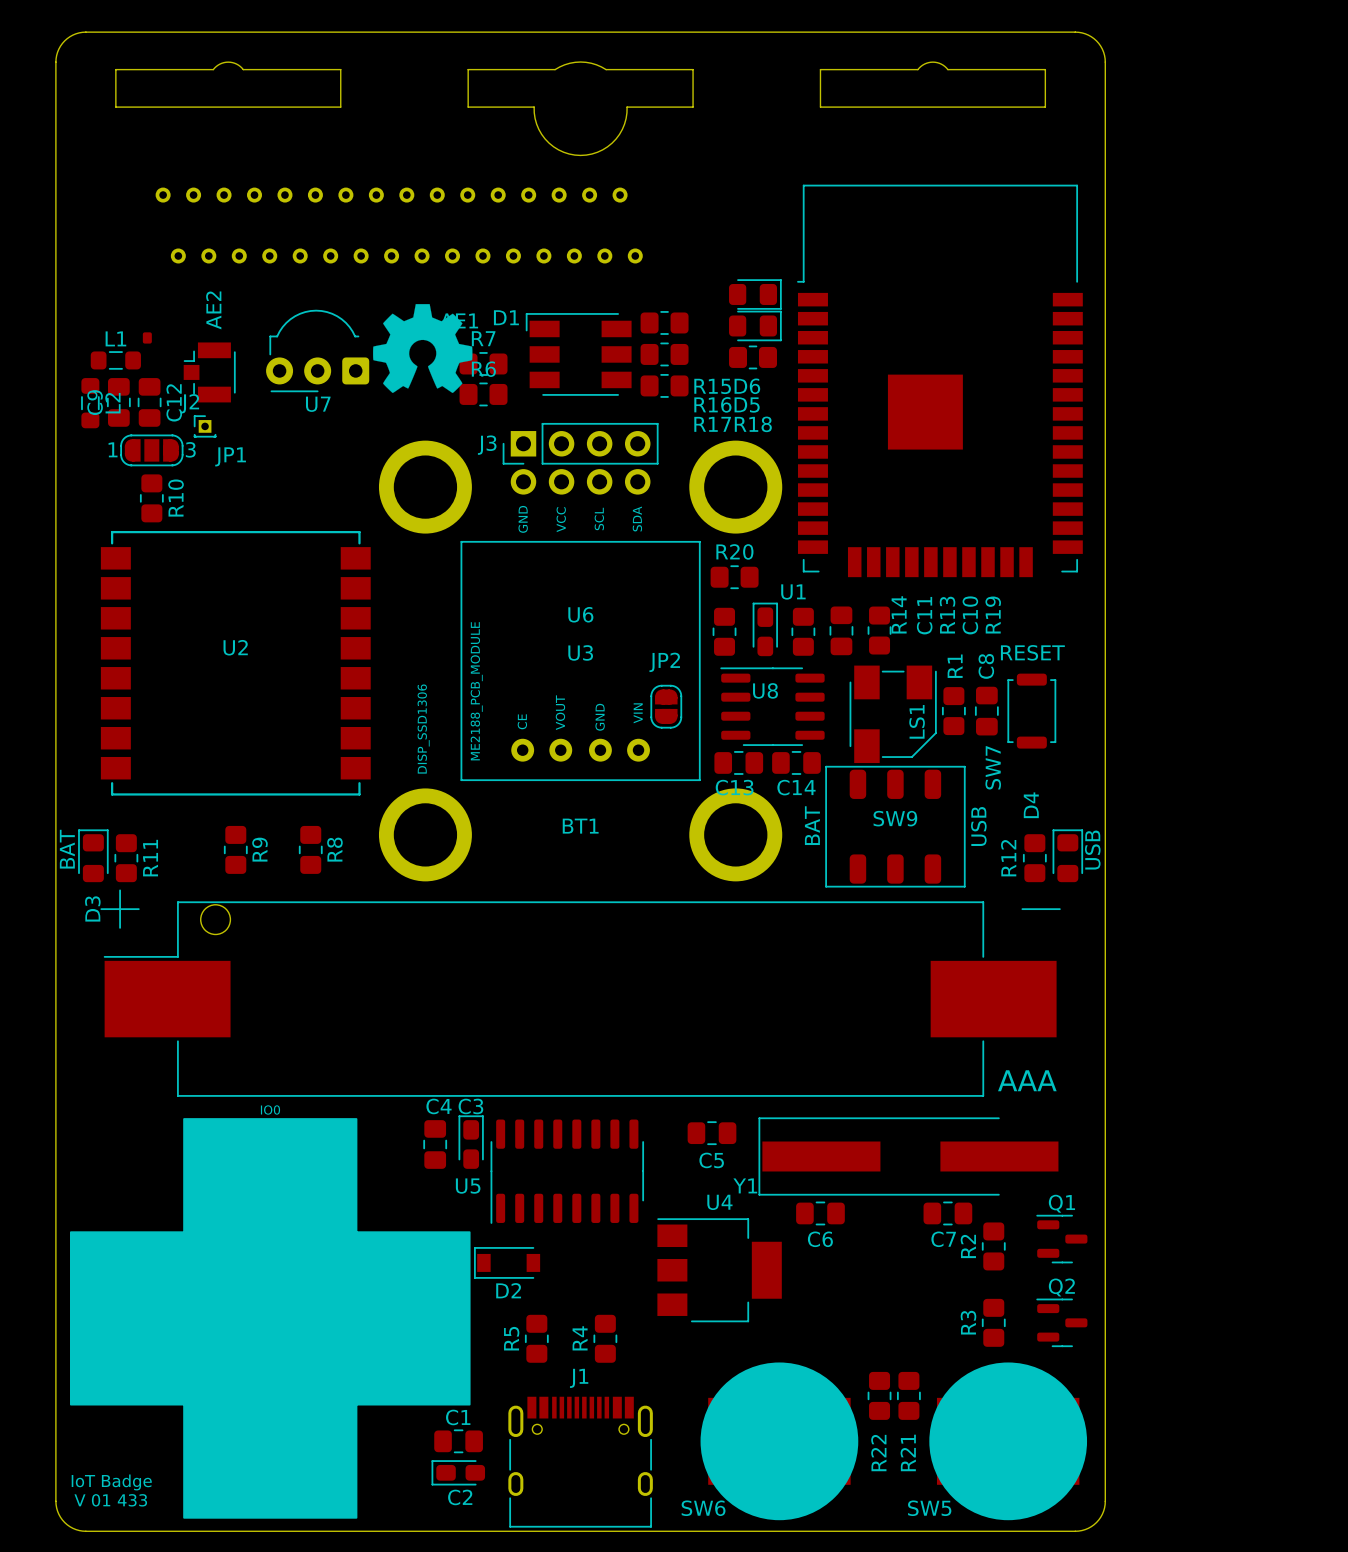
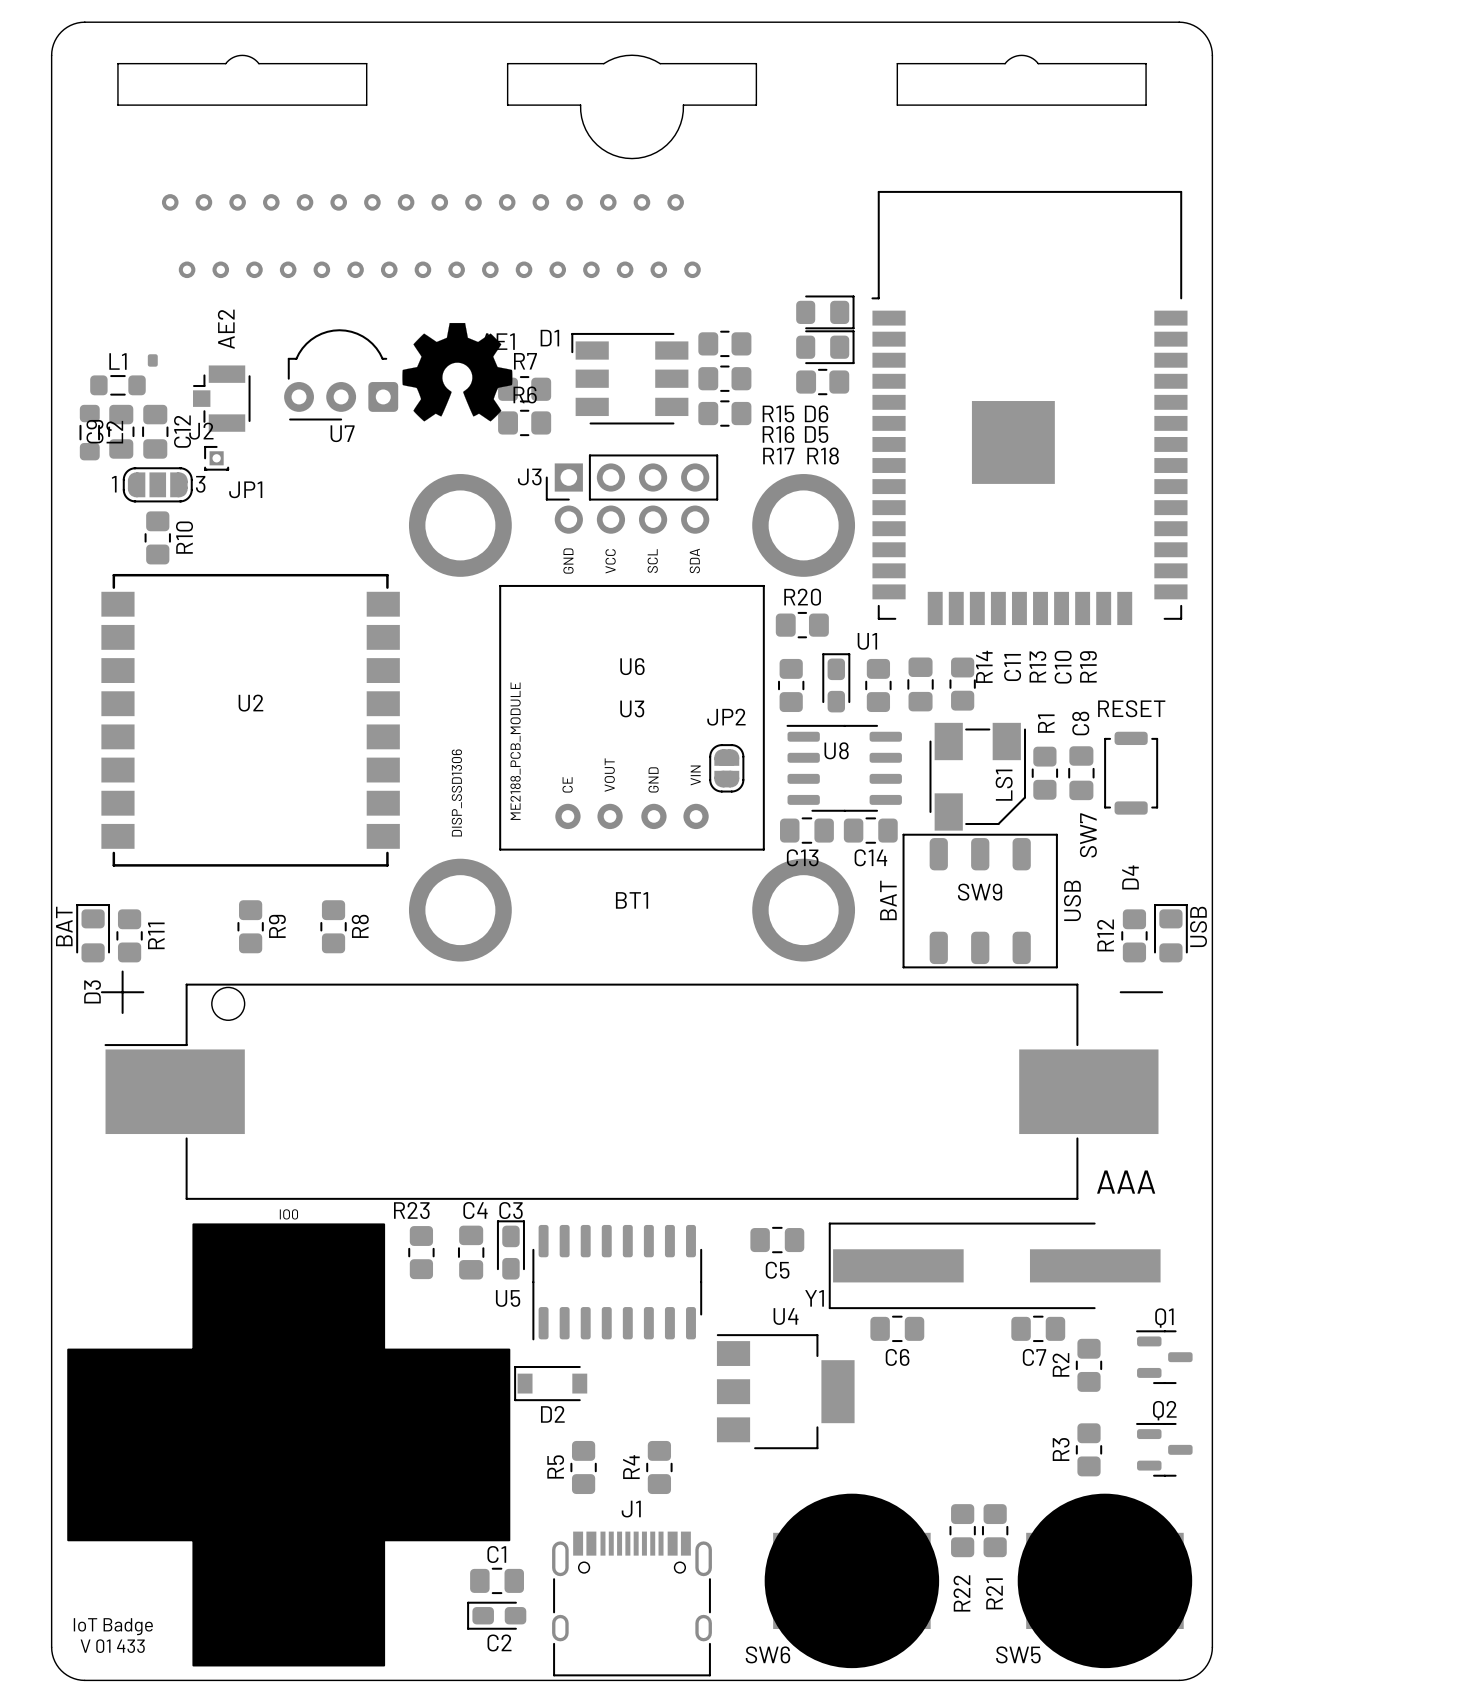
R23: none -> (421, 1252)

